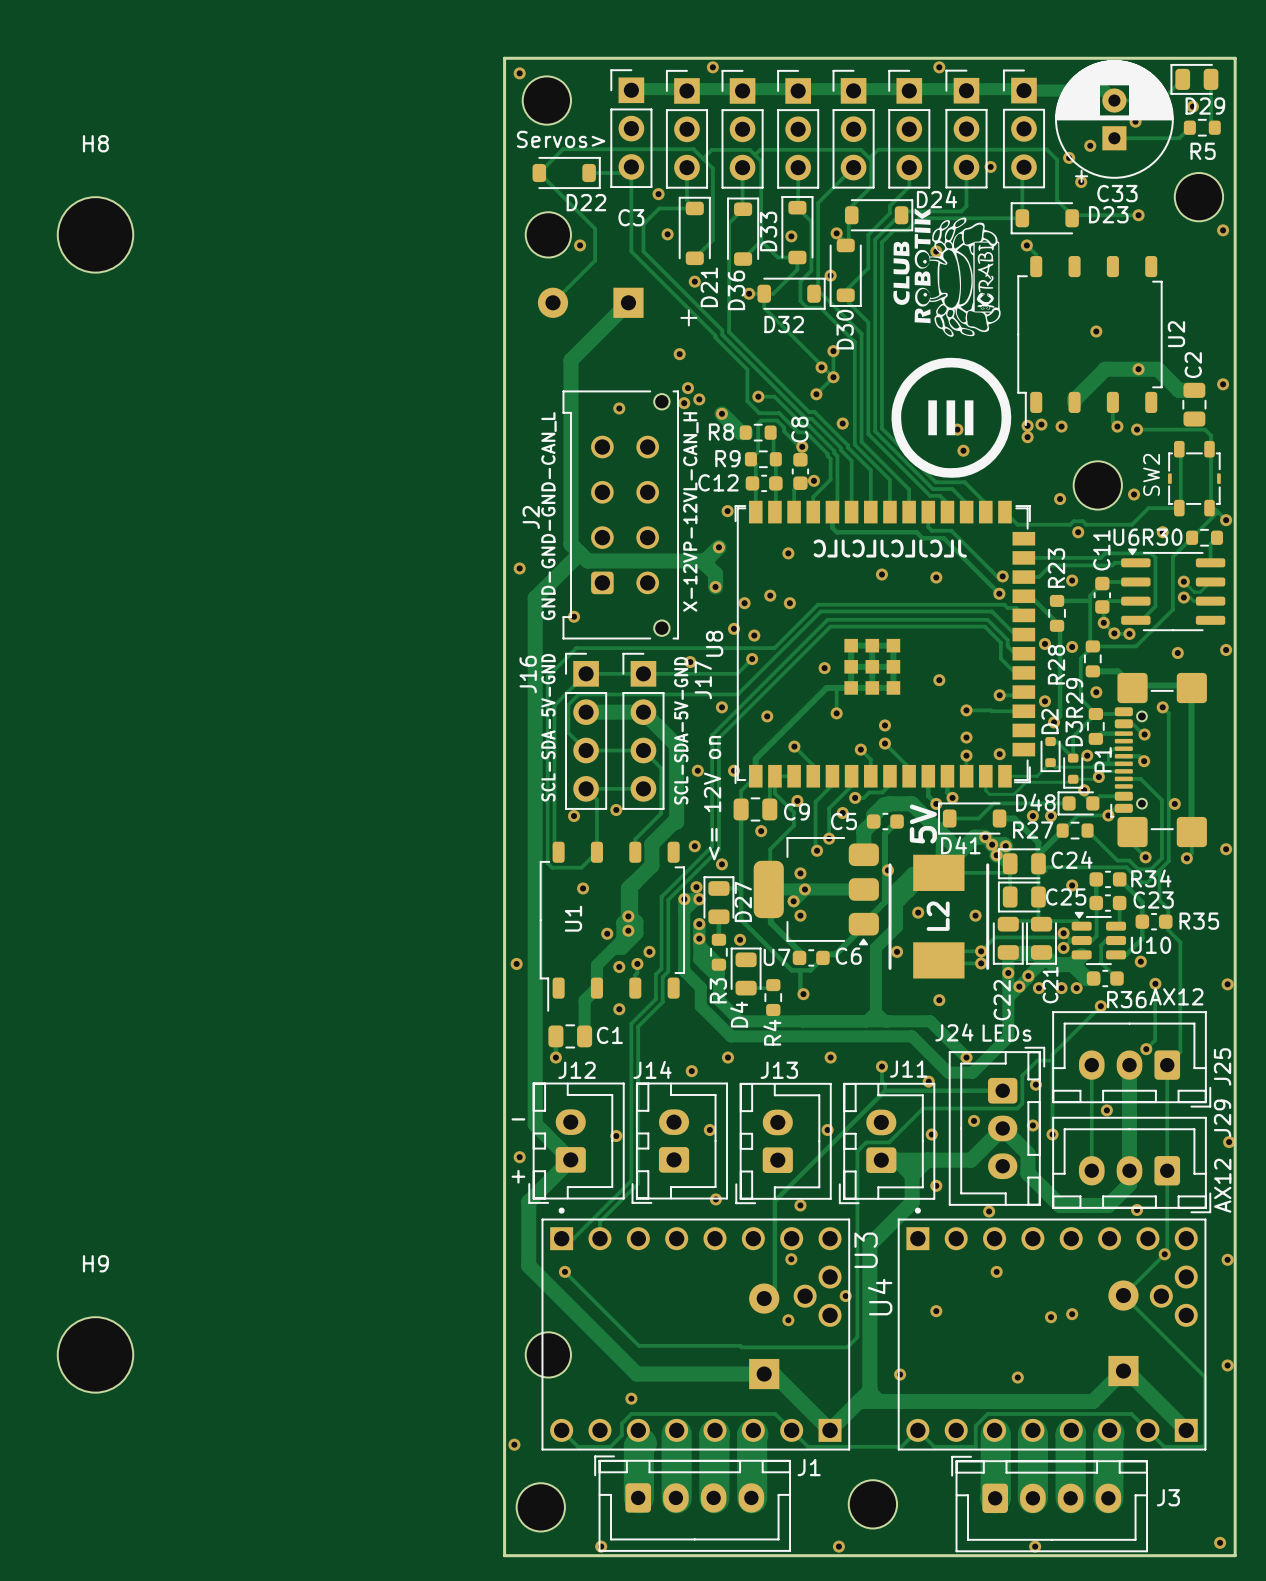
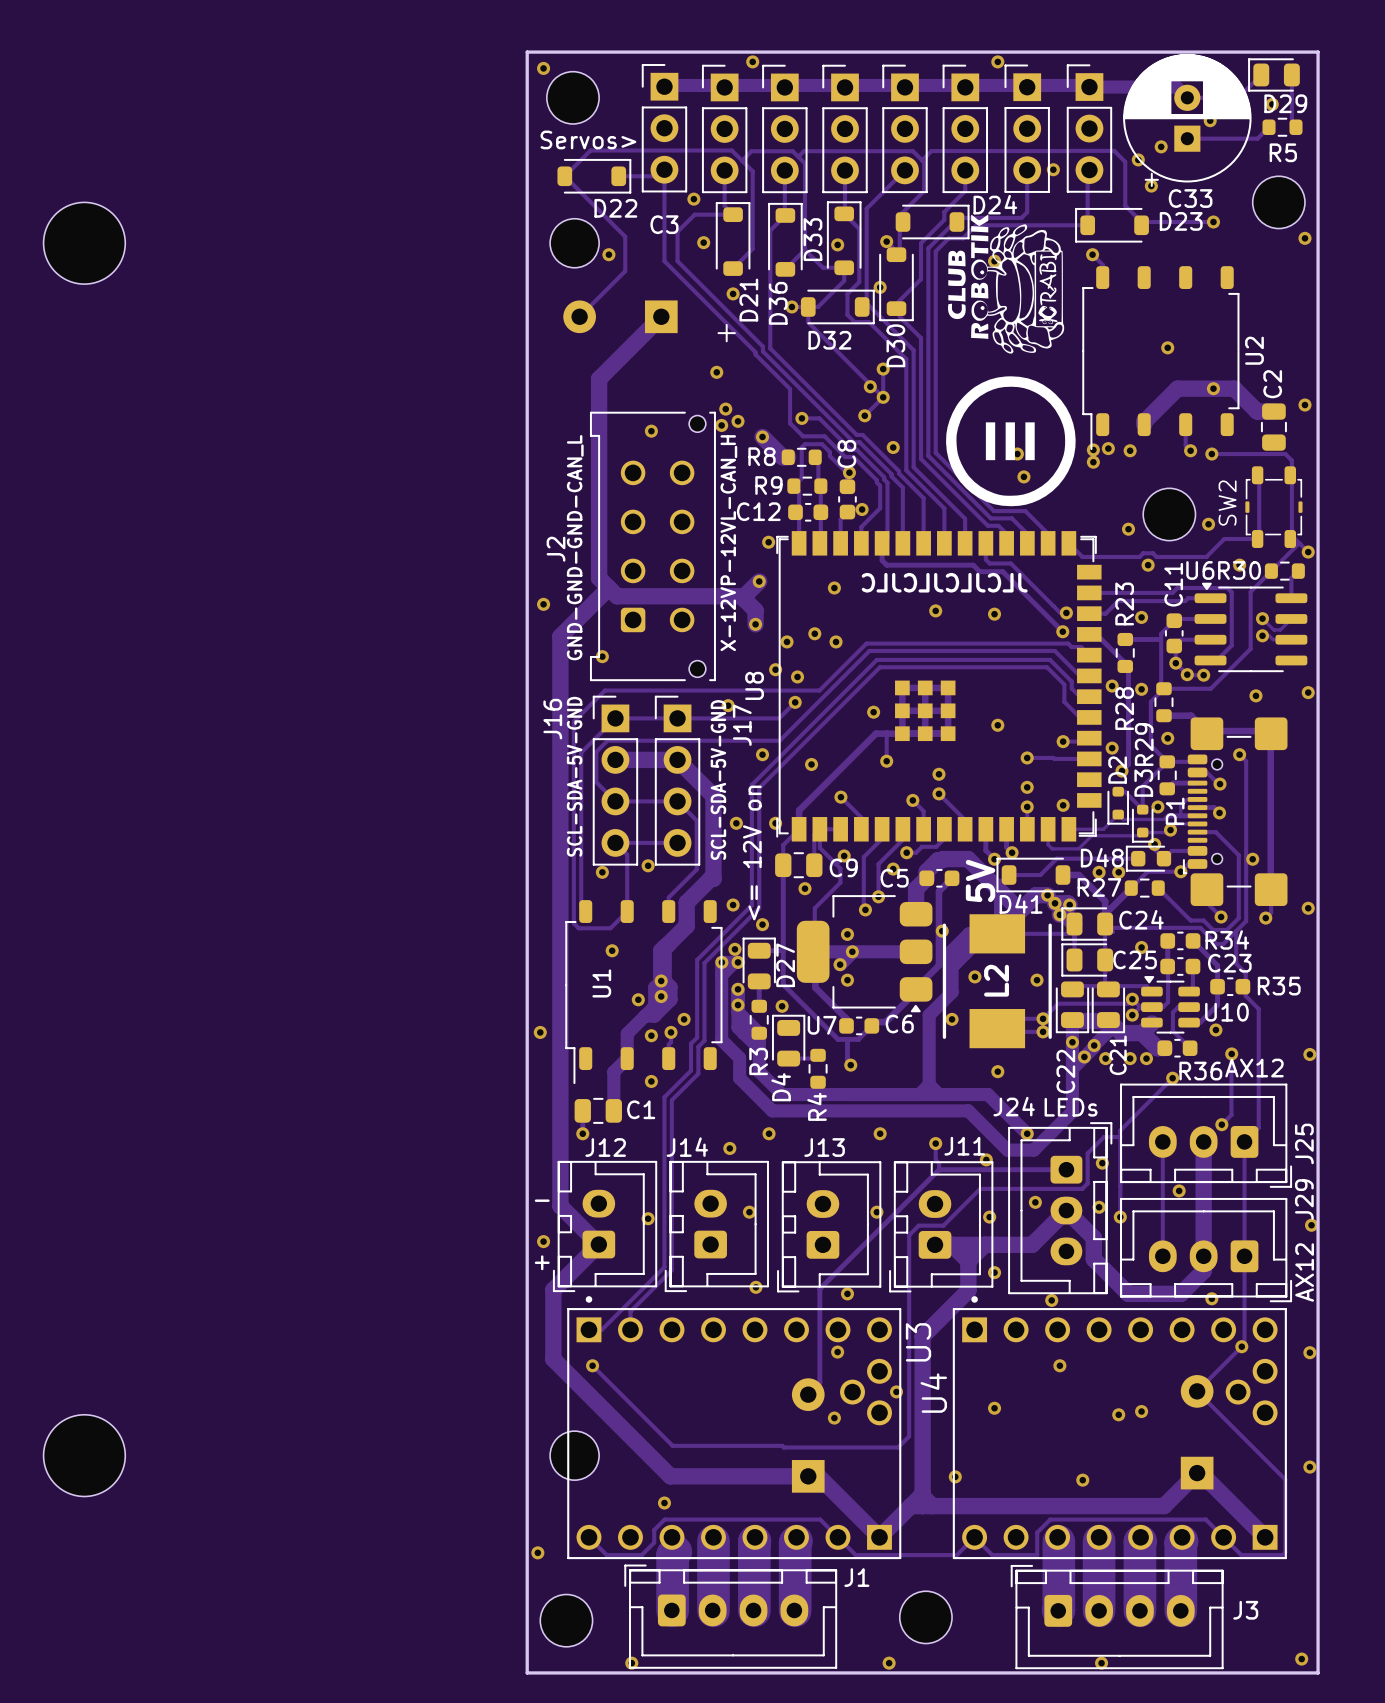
H8 name: H8 (95, 143) -> none
H9 name: H9 (95, 1263) -> none

